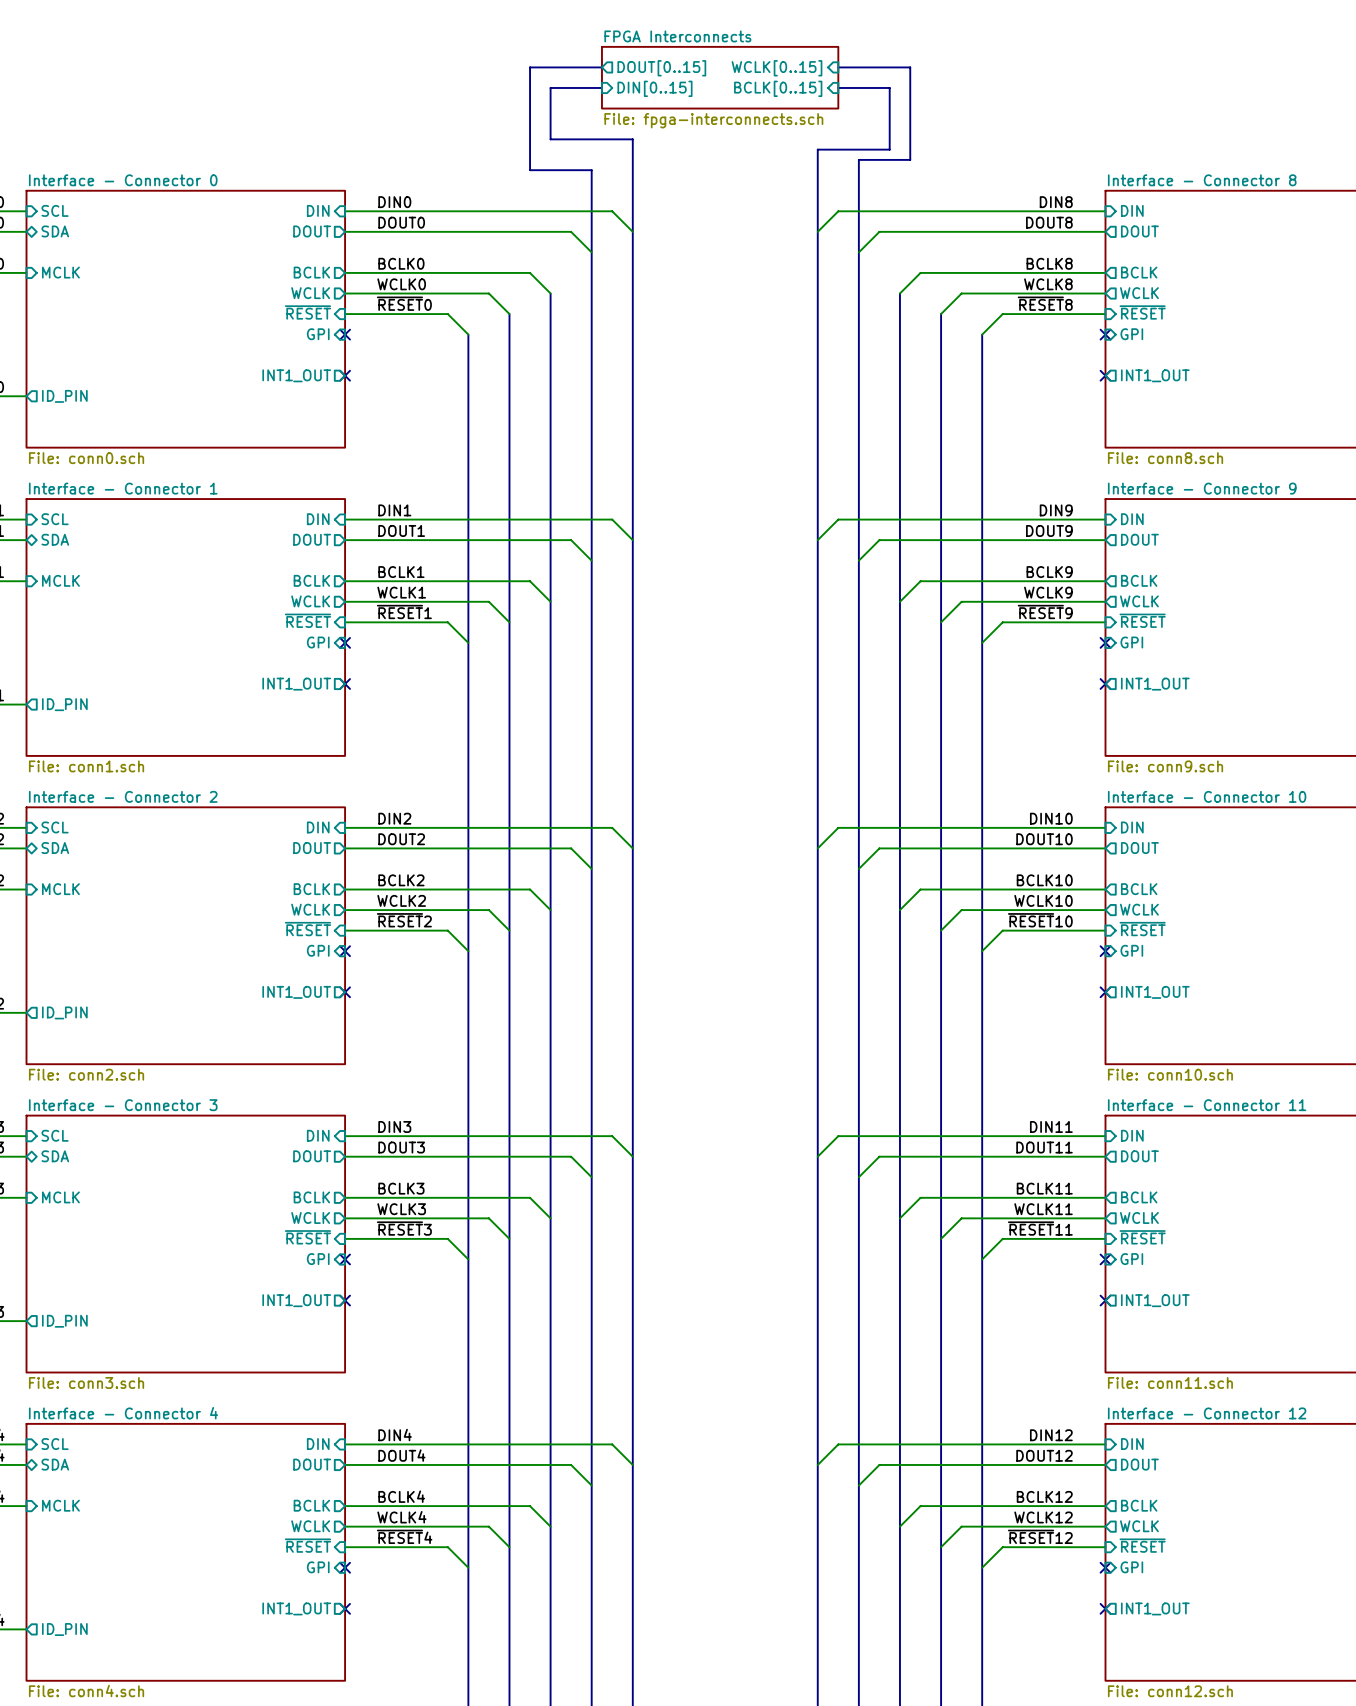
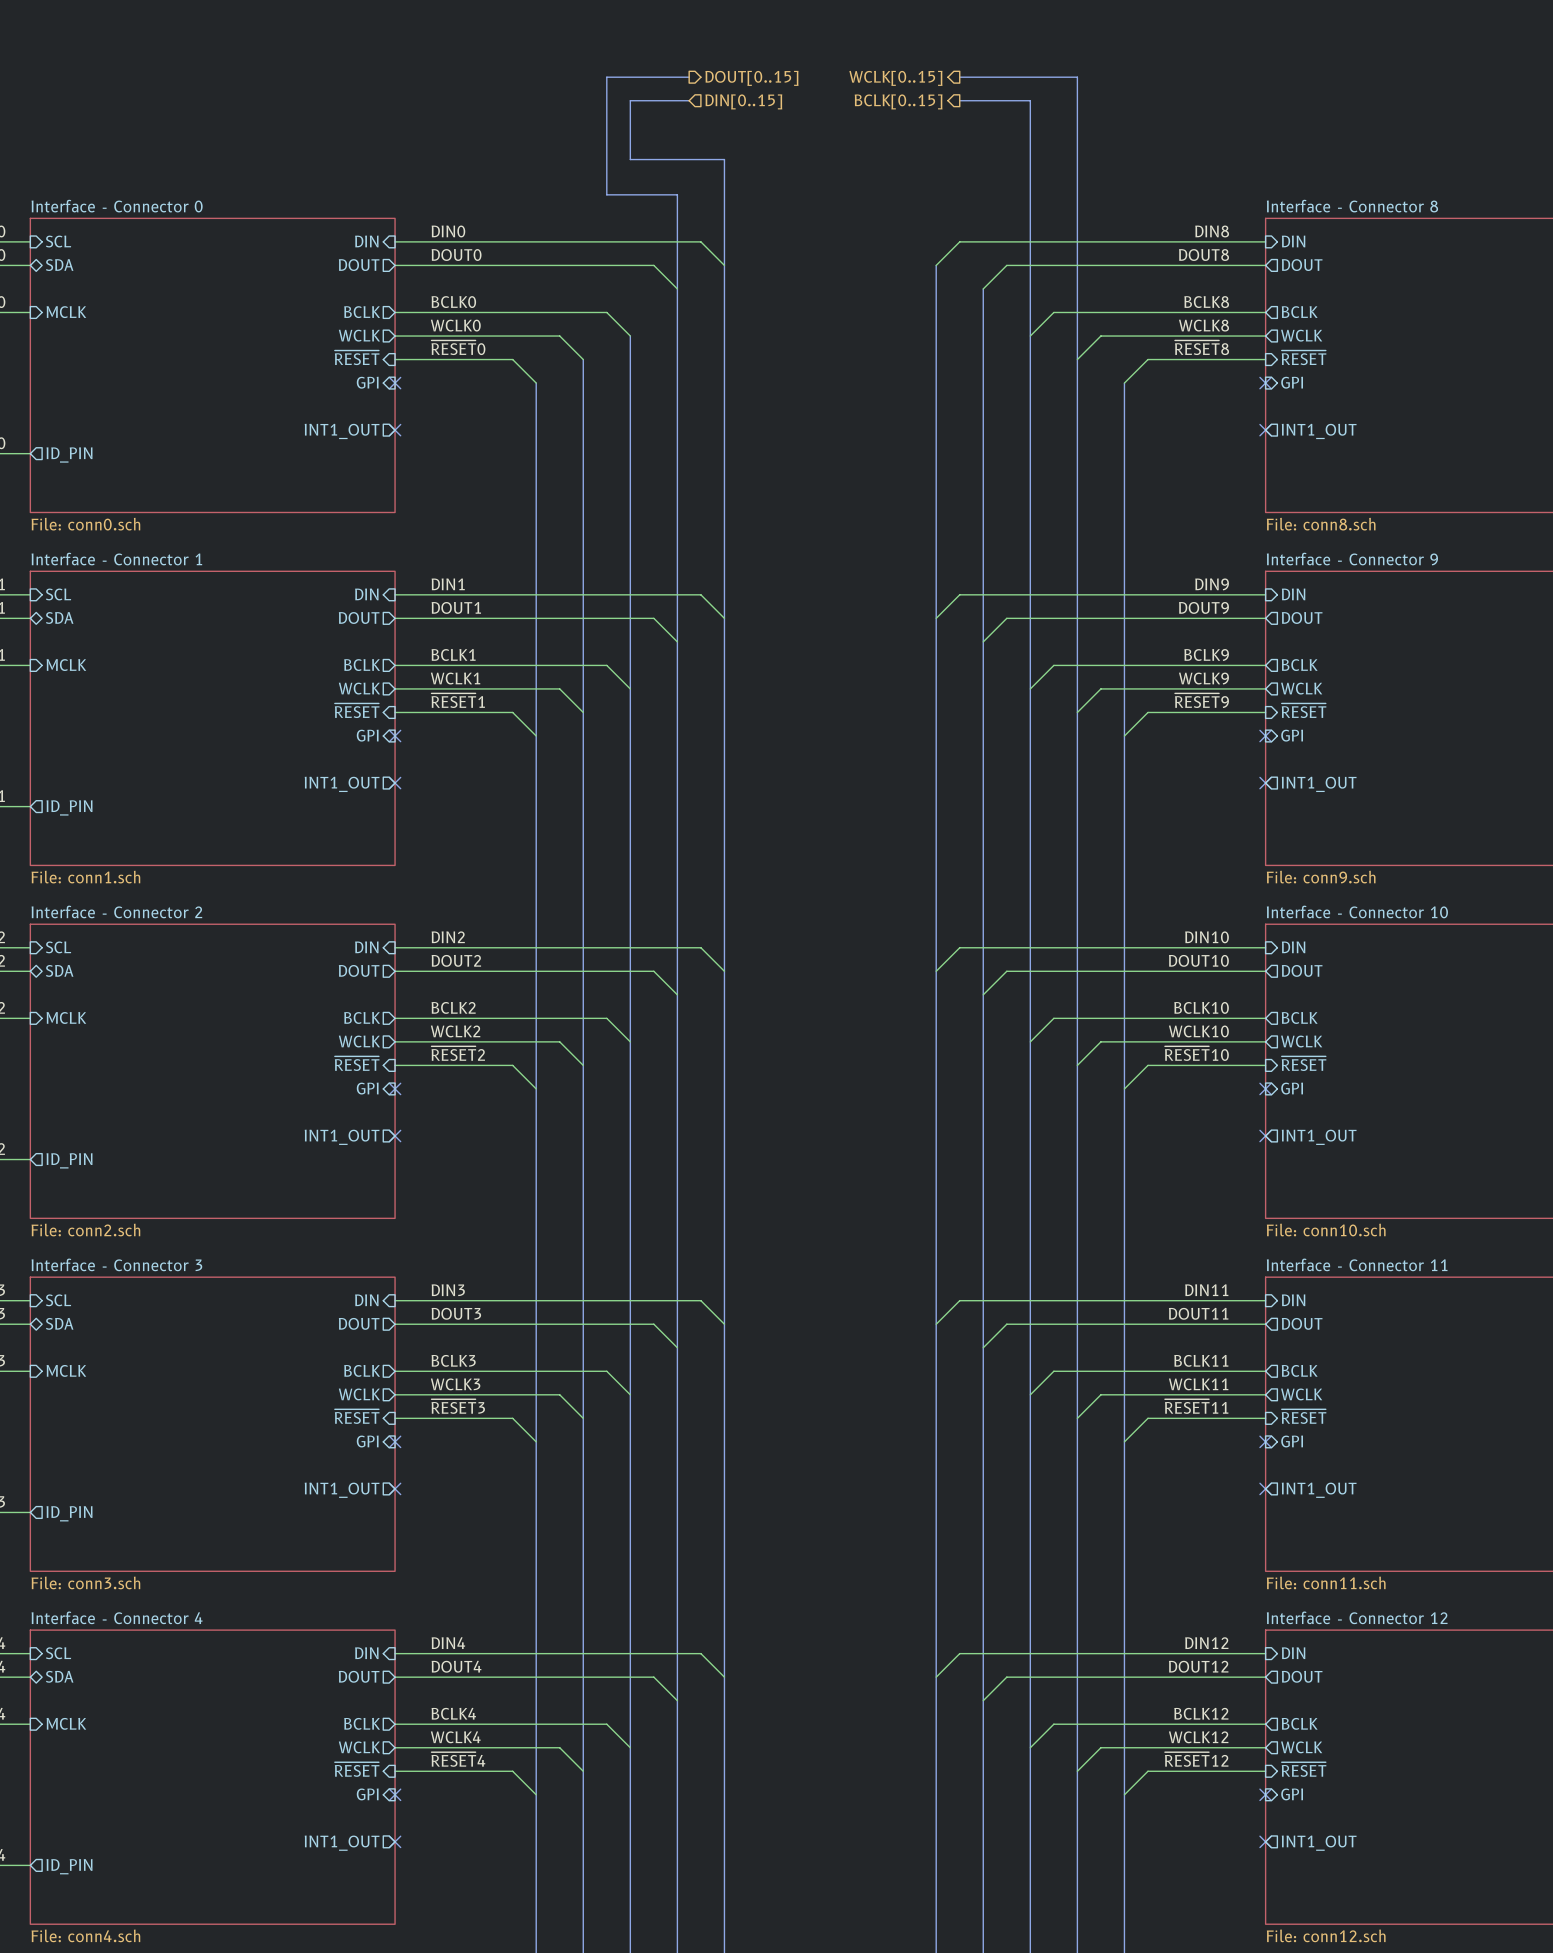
bus: (910, 67) (910, 159) (858, 159) (858, 252) -> (1042, 77) (1077, 77) (1077, 359)
sheet pin: DOUT[0..15] (661, 68) -> none
hierarchical label: none -> DOUT[0..15] (751, 78)
sheet pin: WCLK[0..15] (776, 68) -> none
hierarchical label: none -> WCLK[0..15] (895, 78)
sheet FPGA Interconnects: File: fpga-interconnects.sch (720, 77) -> none
bus: (889, 87) (889, 149) (817, 149) (817, 231) -> (1018, 100) (1030, 100) (1030, 336)
sheet pin: DIN[0..15] (654, 88) -> none
hierarchical label: none -> DIN[0..15] (743, 101)
sheet pin: BCLK[0..15] (778, 88) -> none
hierarchical label: none -> BCLK[0..15] (898, 101)

